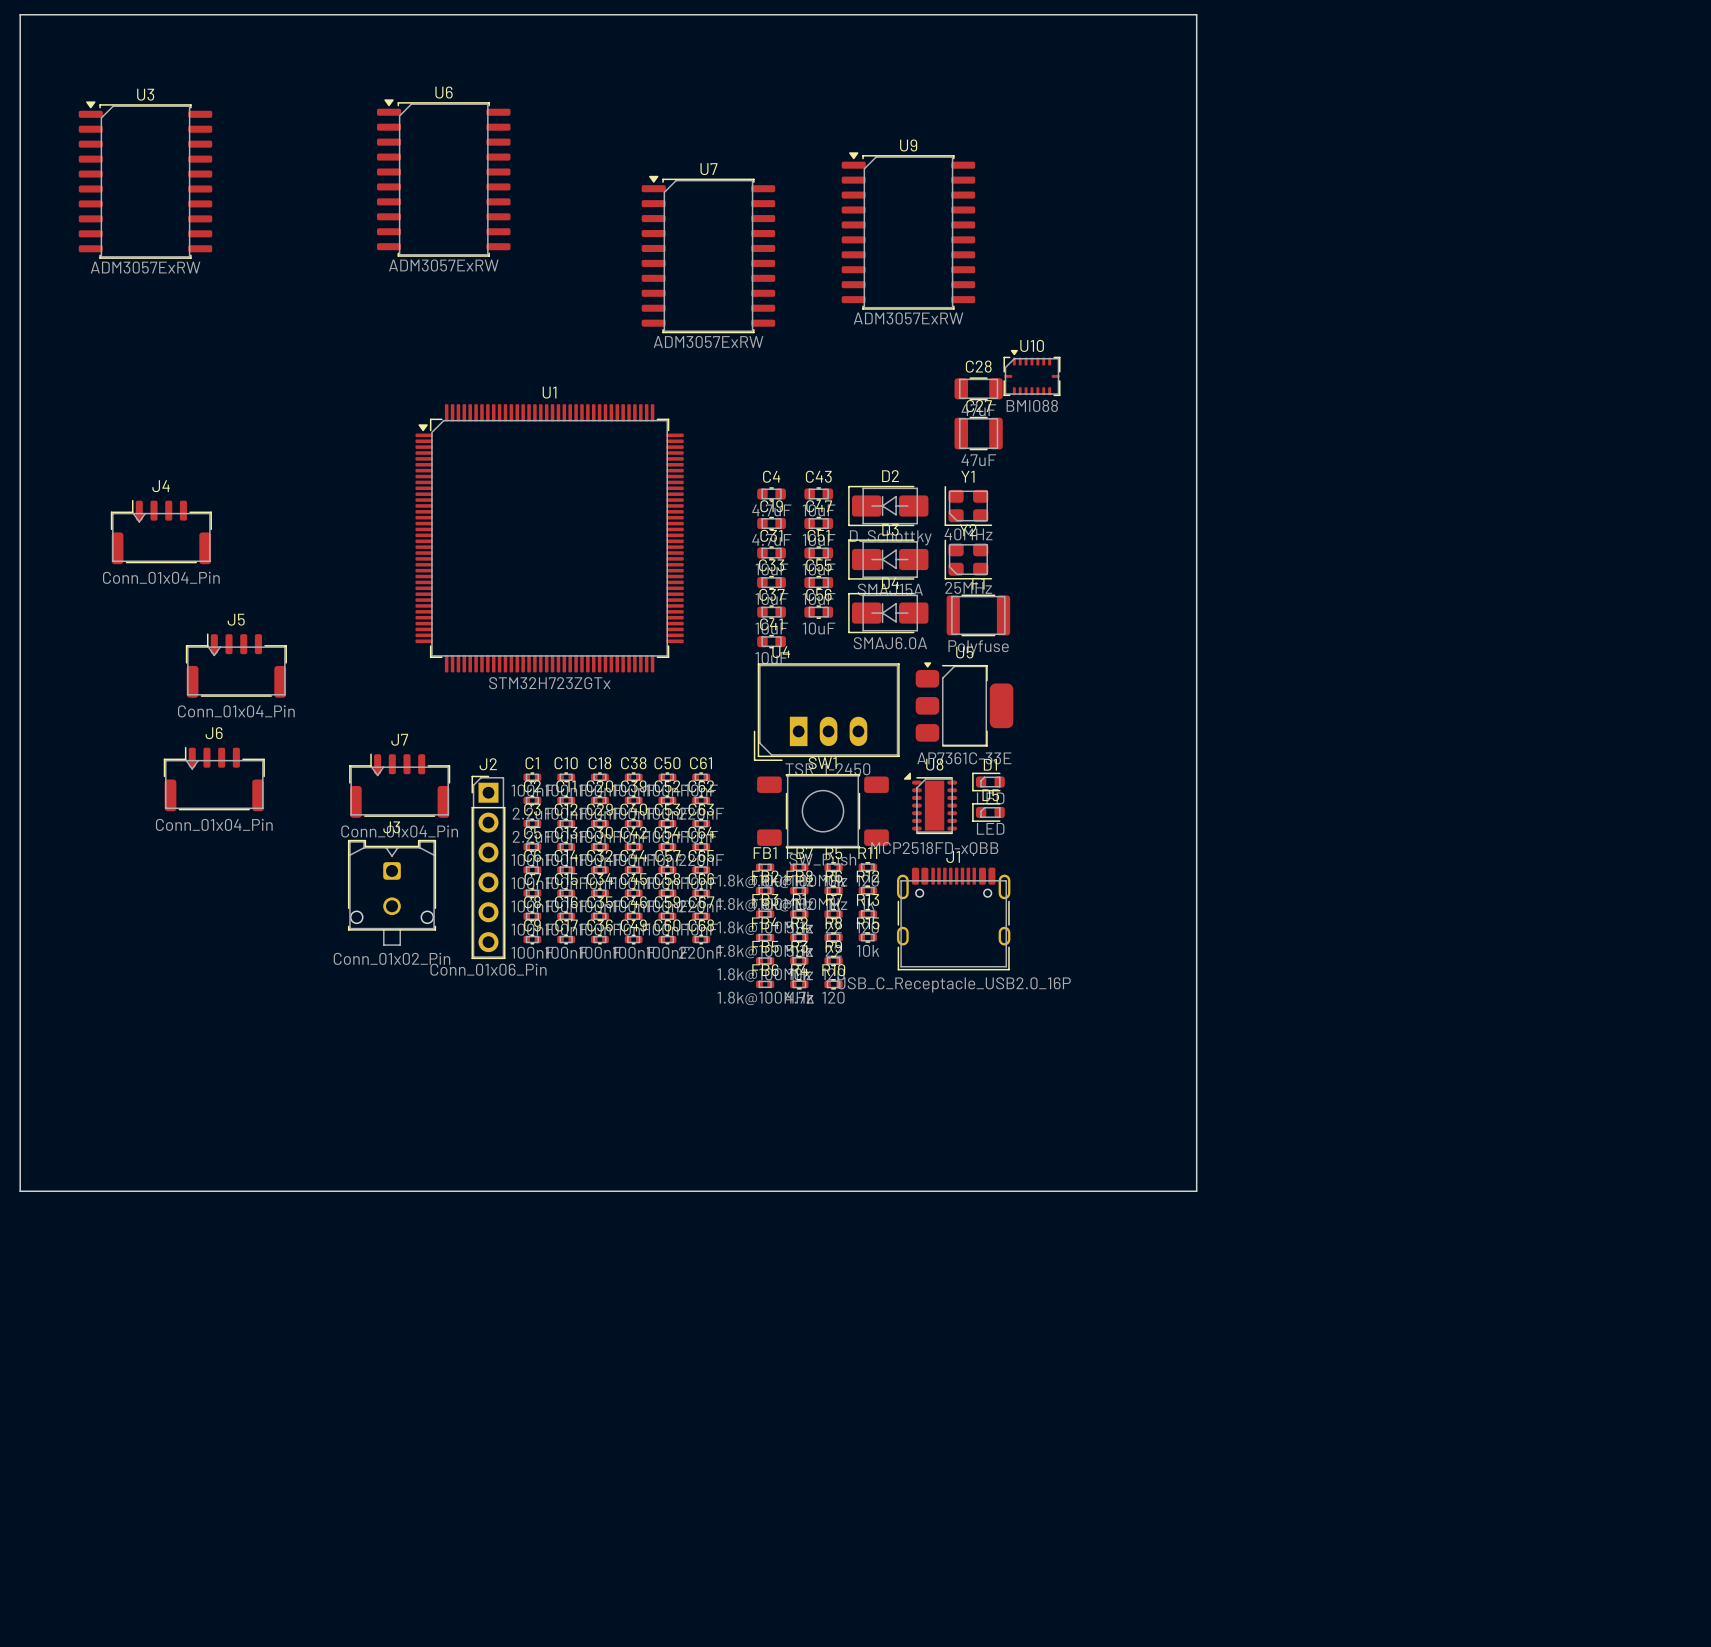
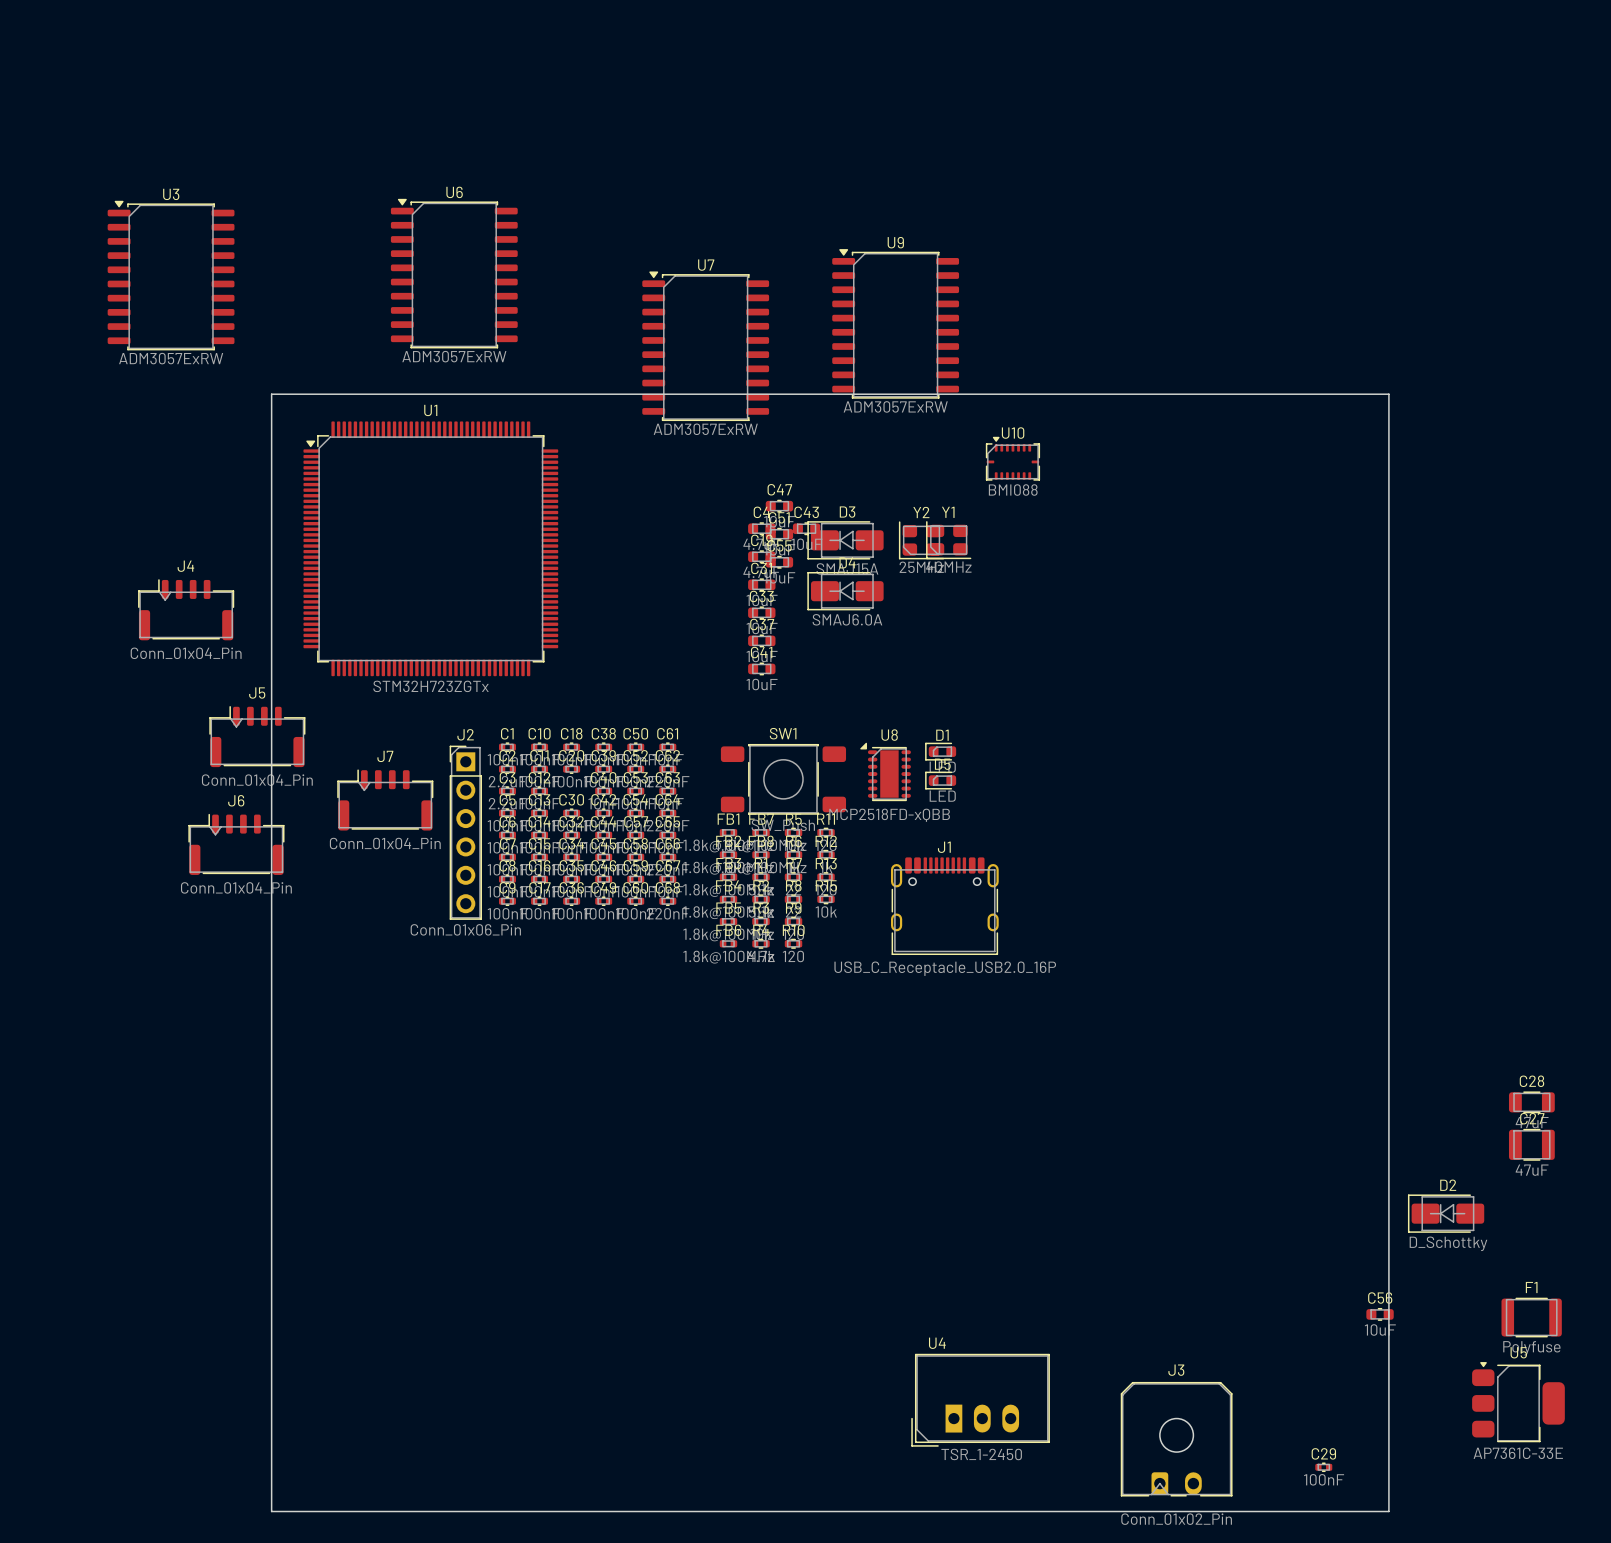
board edge: (20, 14) (1196, 14) (1196, 1191) (20, 1191) (20, 14) -> none
U6 position: (443, 178) -> (454, 273)
U3 position: (145, 180) -> (171, 275)
U9 position: (908, 230) -> (895, 323)
U7 position: (708, 254) -> (705, 346)
U10 position: (1031, 372) -> (1012, 458)
C28 position: (978, 388) -> (1531, 1102)
board edge: none -> (271, 394) (1388, 394) (1388, 1511) (271, 1511) (271, 394)
C27 position: (978, 433) -> (1531, 1144)
C4 position: (771, 494) -> (761, 528)
C43 position: (818, 494) -> (806, 528)
D2 position: (888, 506) -> (1446, 1213)
Y1 position: (968, 506) -> (948, 540)
C19 position: (771, 523) -> (761, 556)
J4 position: (161, 532) -> (186, 609)
U1 position: (549, 538) -> (430, 548)
C31 position: (771, 553) -> (761, 584)
C33 position: (771, 582) -> (761, 612)
C37 position: (771, 612) -> (761, 640)
C56 position: (818, 612) -> (1380, 1314)
F1 position: (978, 615) -> (1531, 1317)
C41 position: (771, 641) -> (761, 668)
J5 position: (236, 665) -> (257, 736)
U5 position: (964, 704) -> (1518, 1402)
U4 position: (826, 712) -> (980, 1400)
J6 position: (214, 779) -> (236, 844)
J7 position: (399, 785) -> (385, 800)
C29 position: (599, 823) -> (1323, 1467)
J3 footprint: [347, 839, 437, 946] -> [1120, 1382, 1233, 1497]
J1 position: (953, 919) -> (944, 906)

